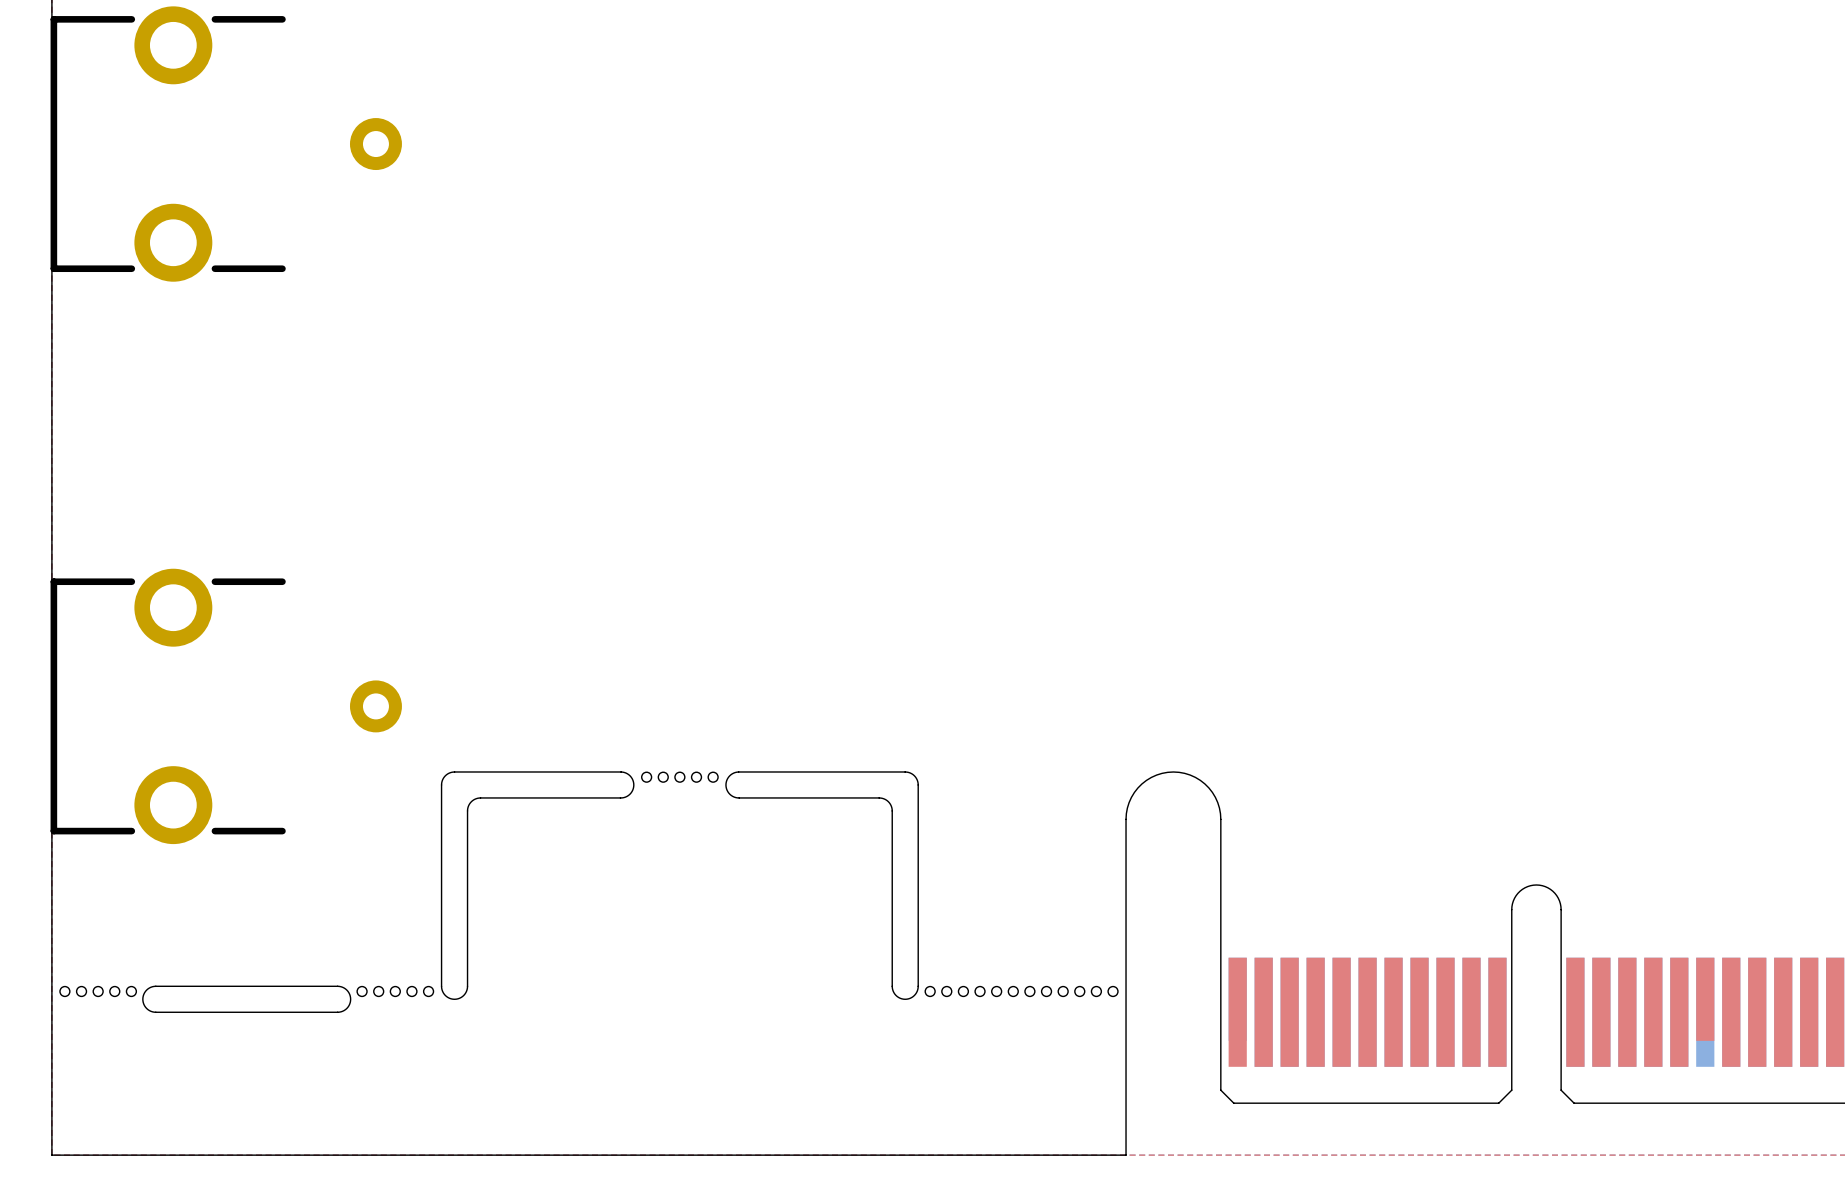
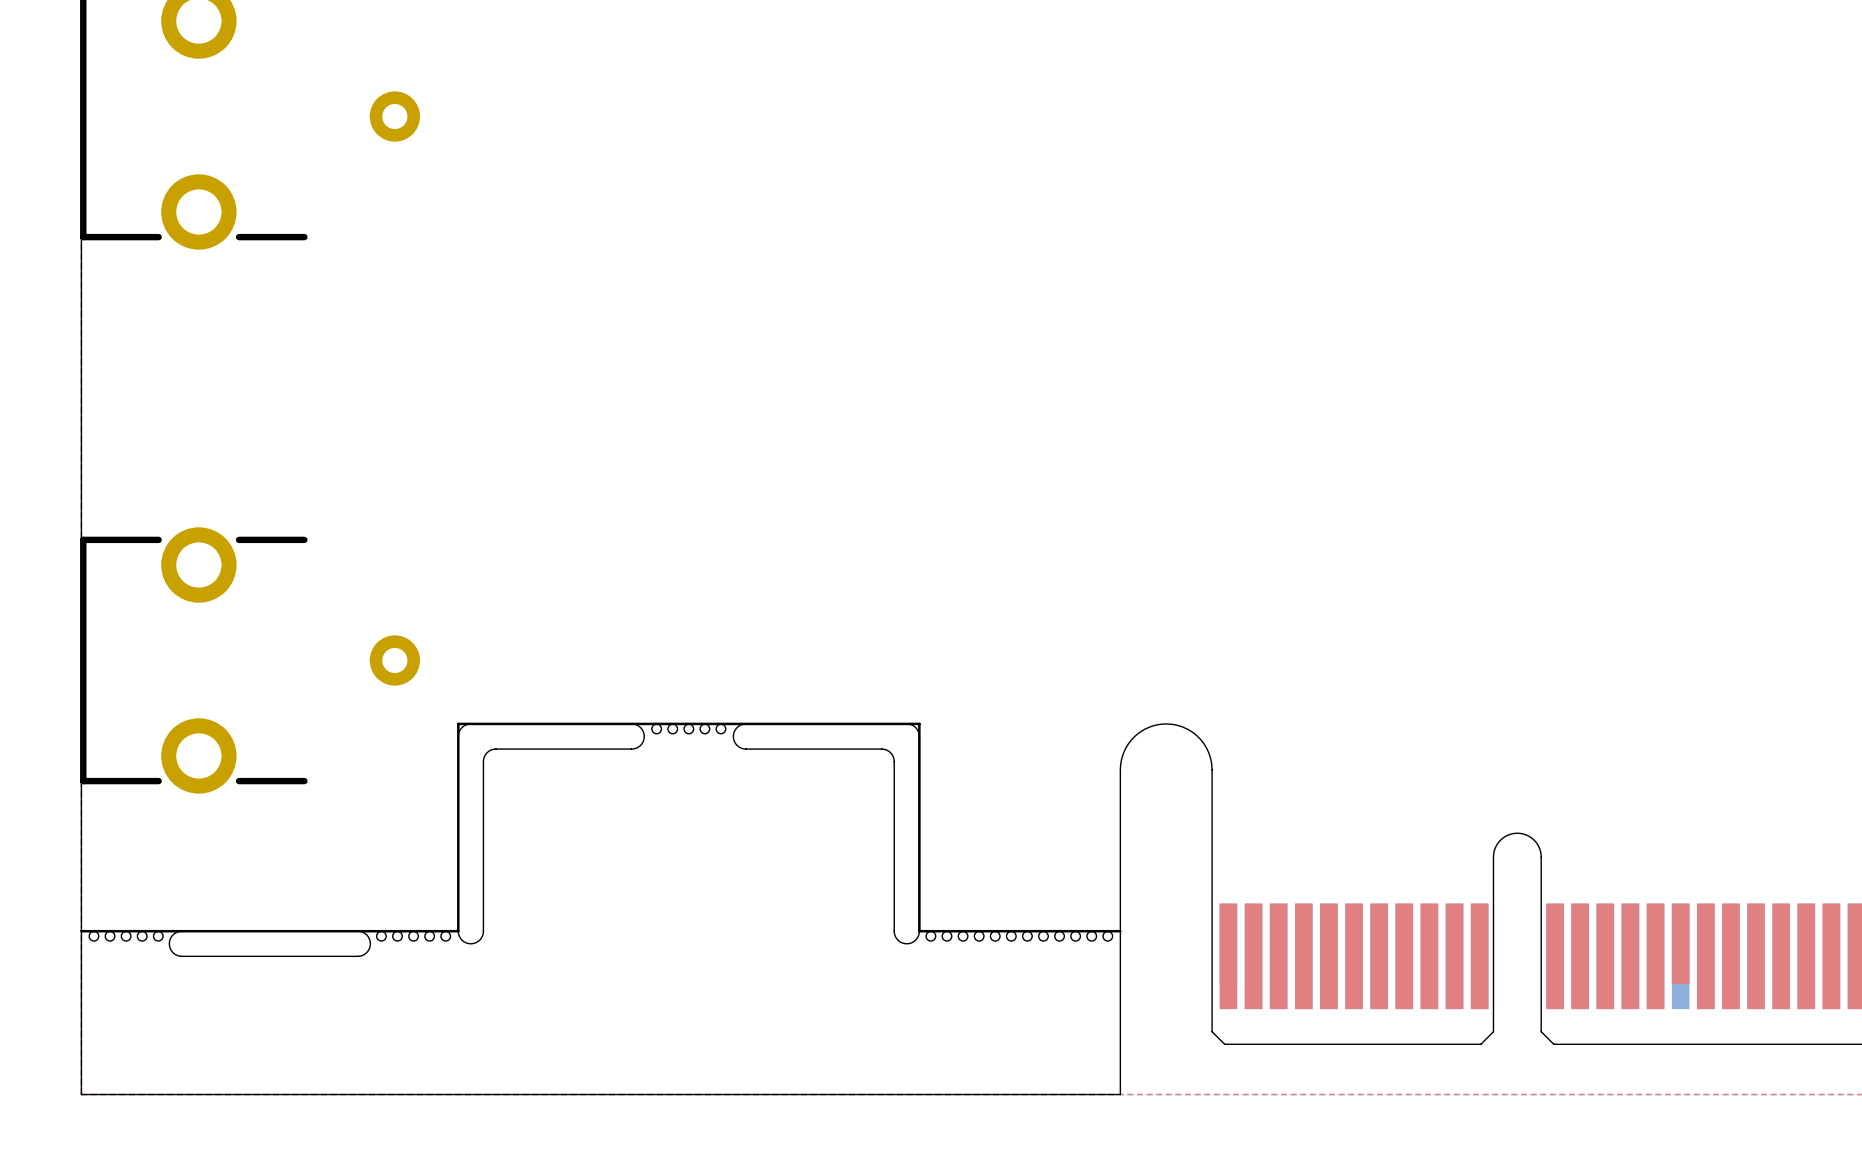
line: none -> (81, 931) (458, 931) (458, 723) (919, 723) (919, 931) (1120, 931)

